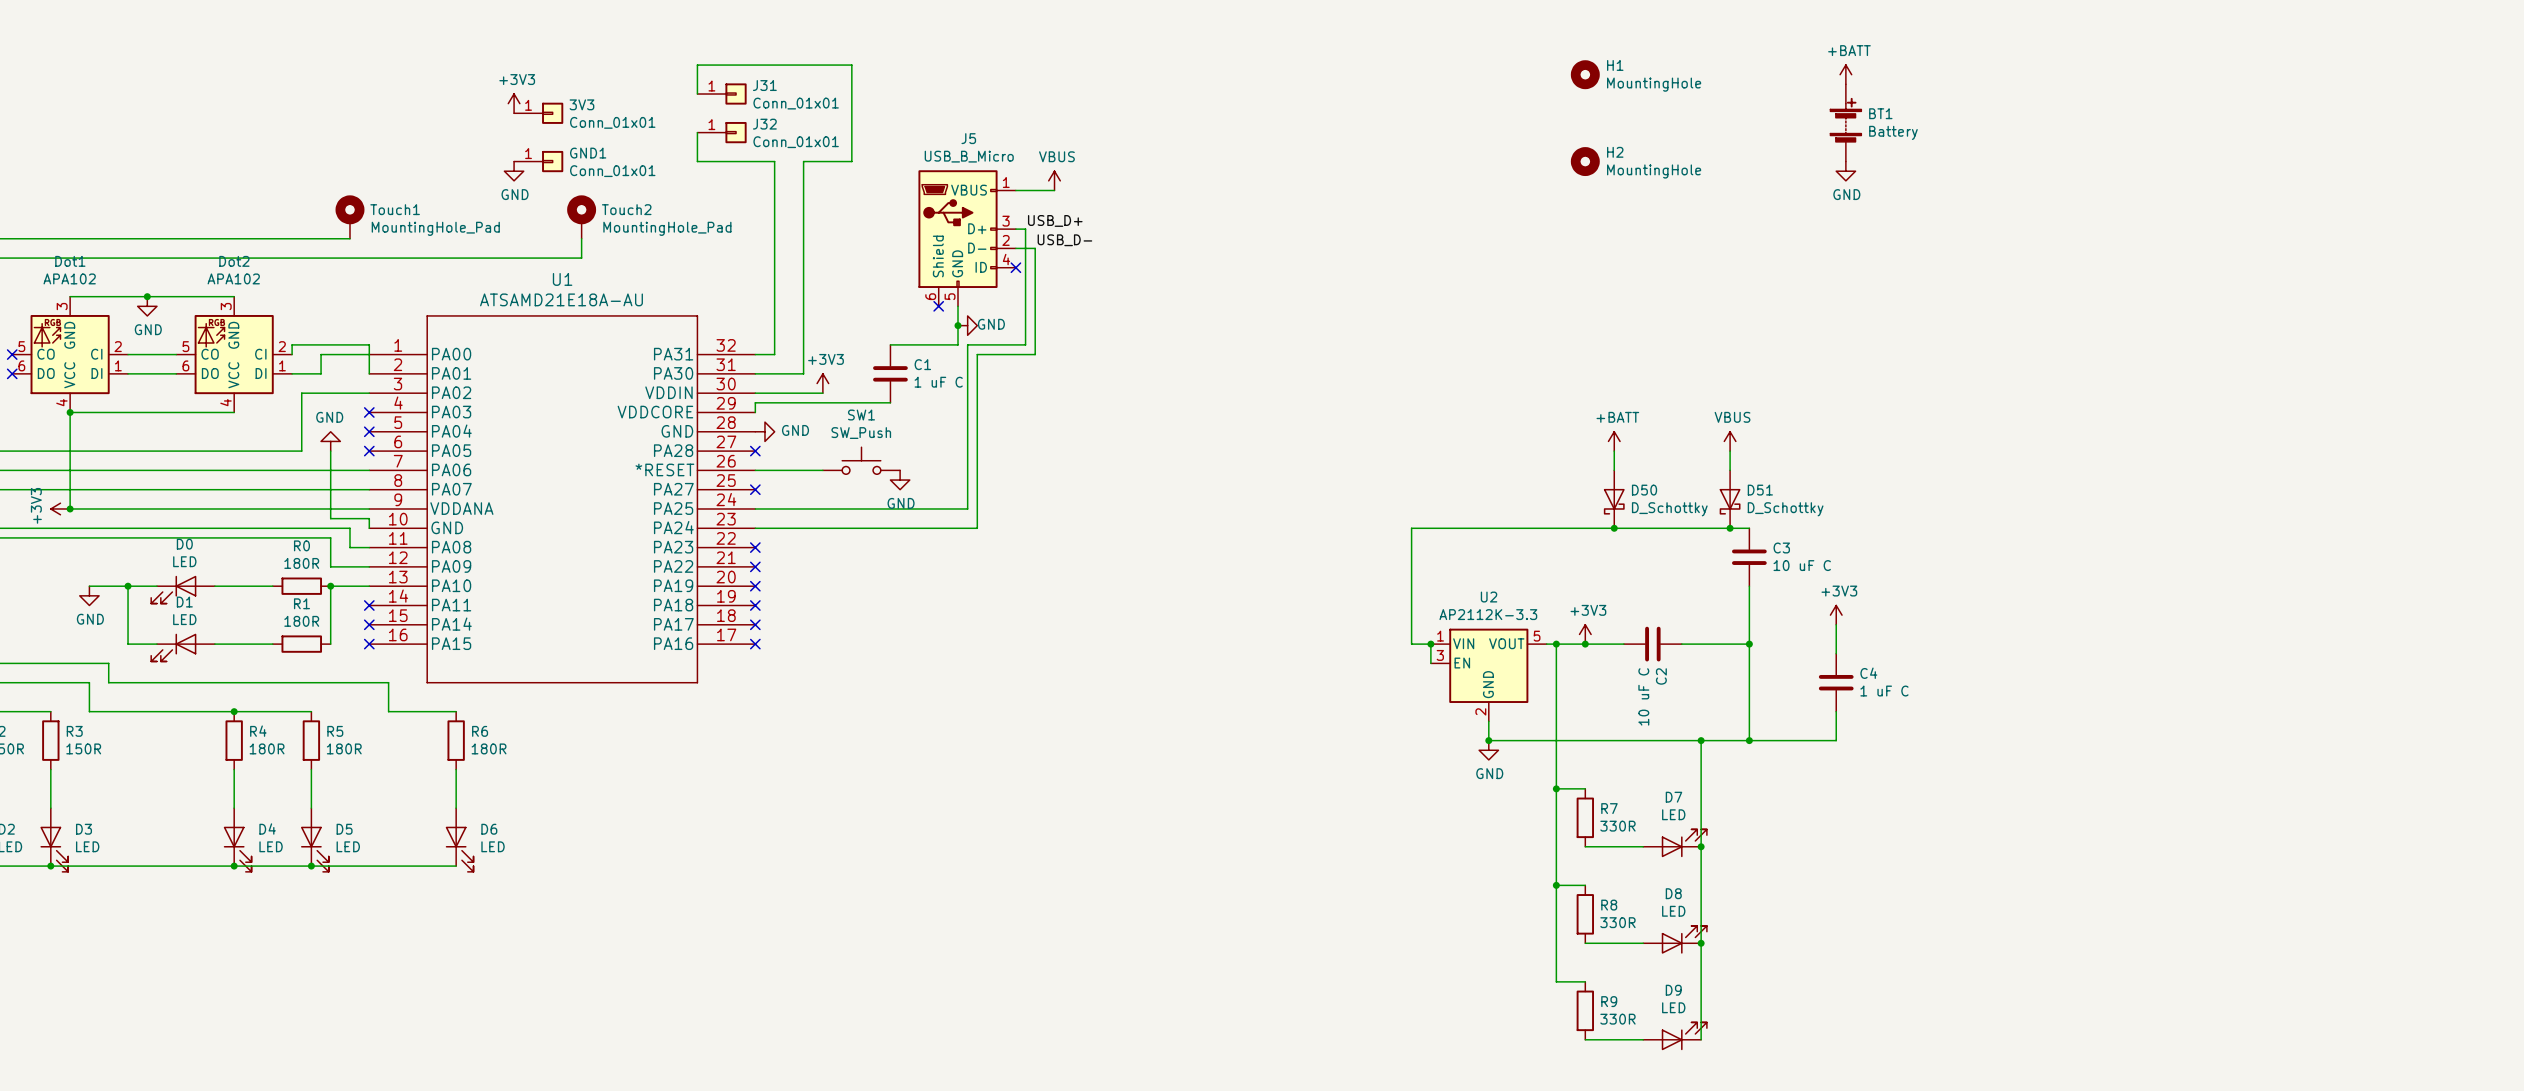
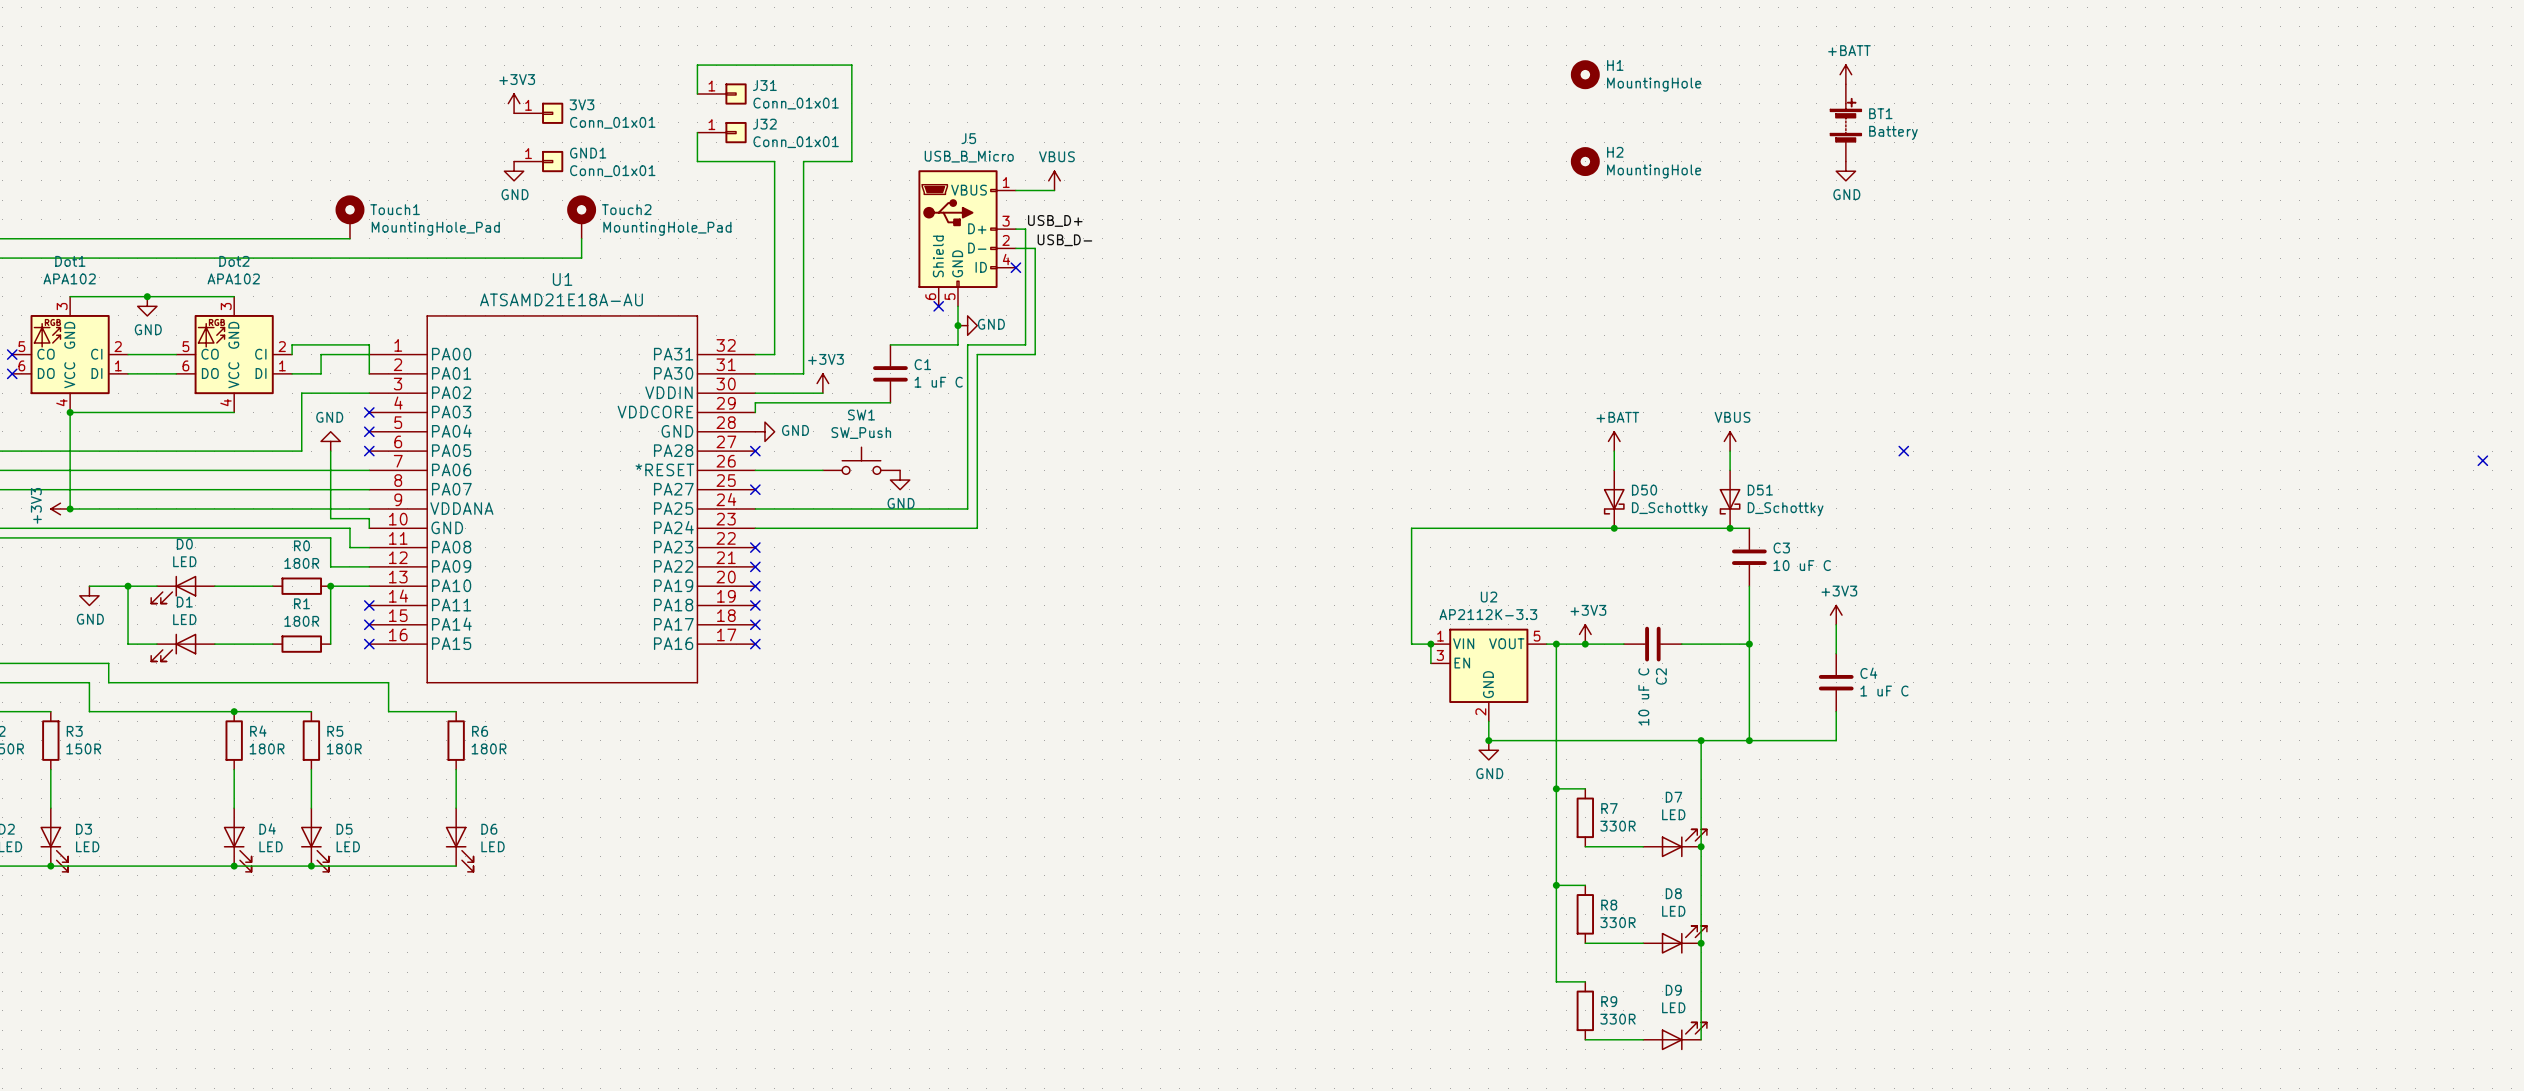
no-connect mark: none -> (1903, 451)
no-connect mark: none -> (2482, 460)

